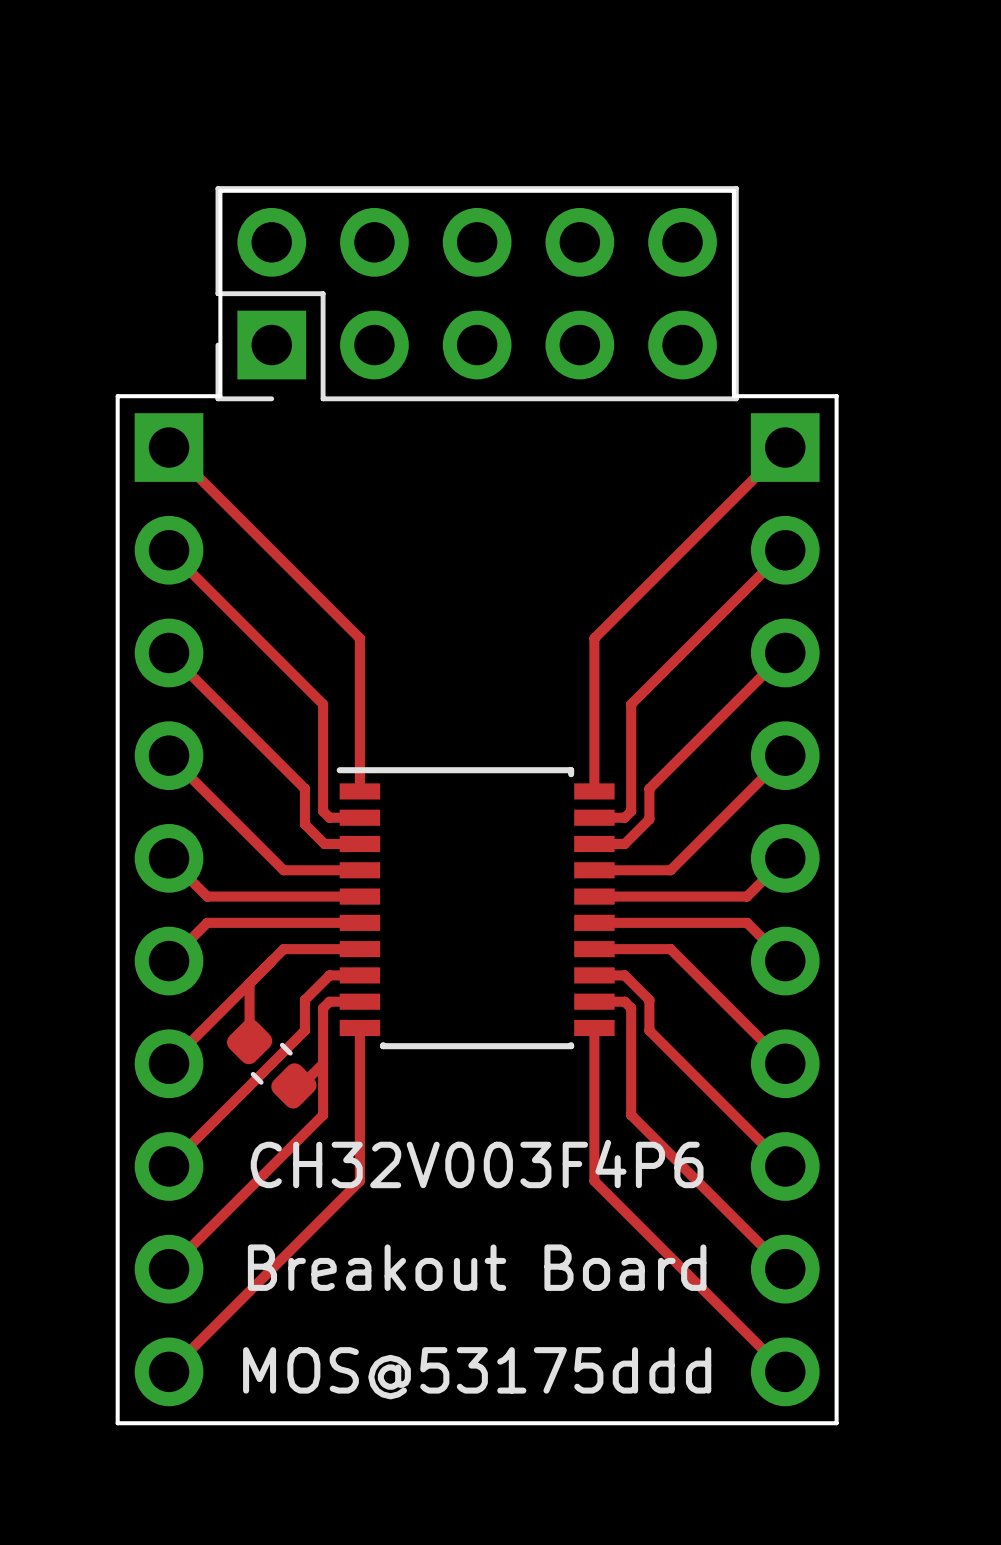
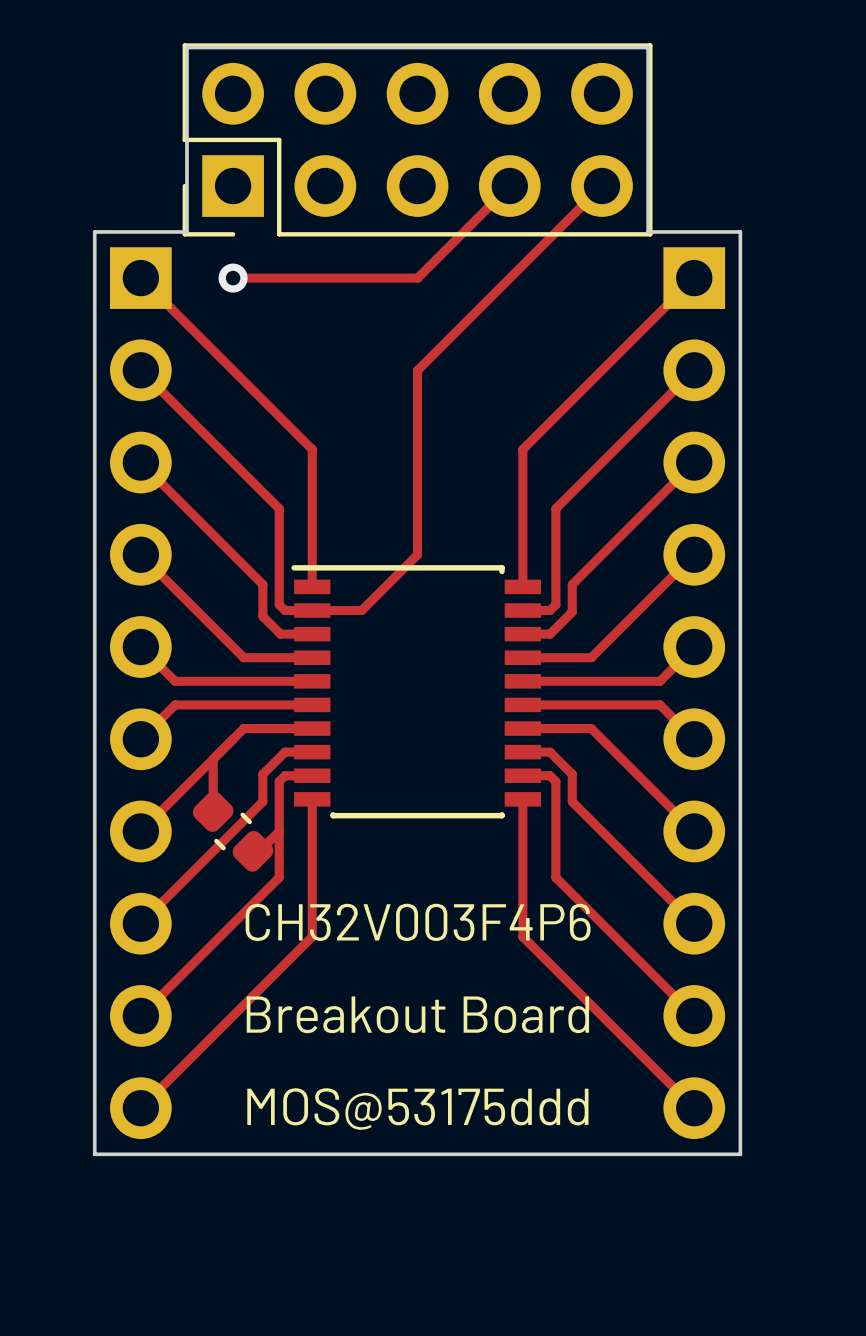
track: none -> (509, 186) (417, 278) (233, 278)
track: none -> (602, 186) (417, 370) (417, 554) (361, 610) (312, 610)
via: none -> (233, 278)

